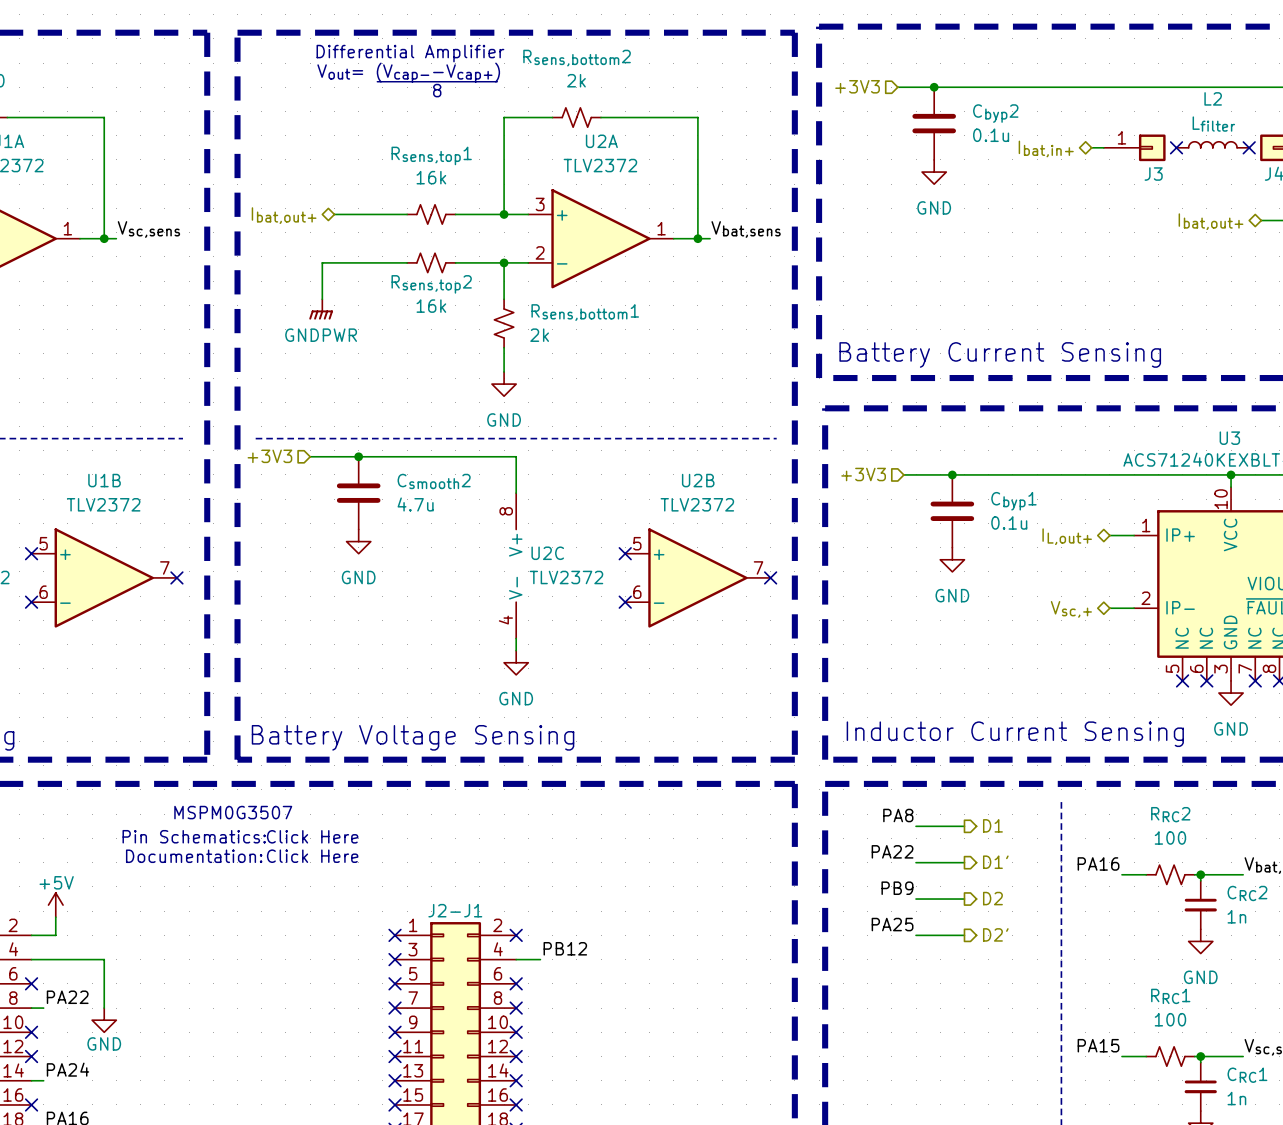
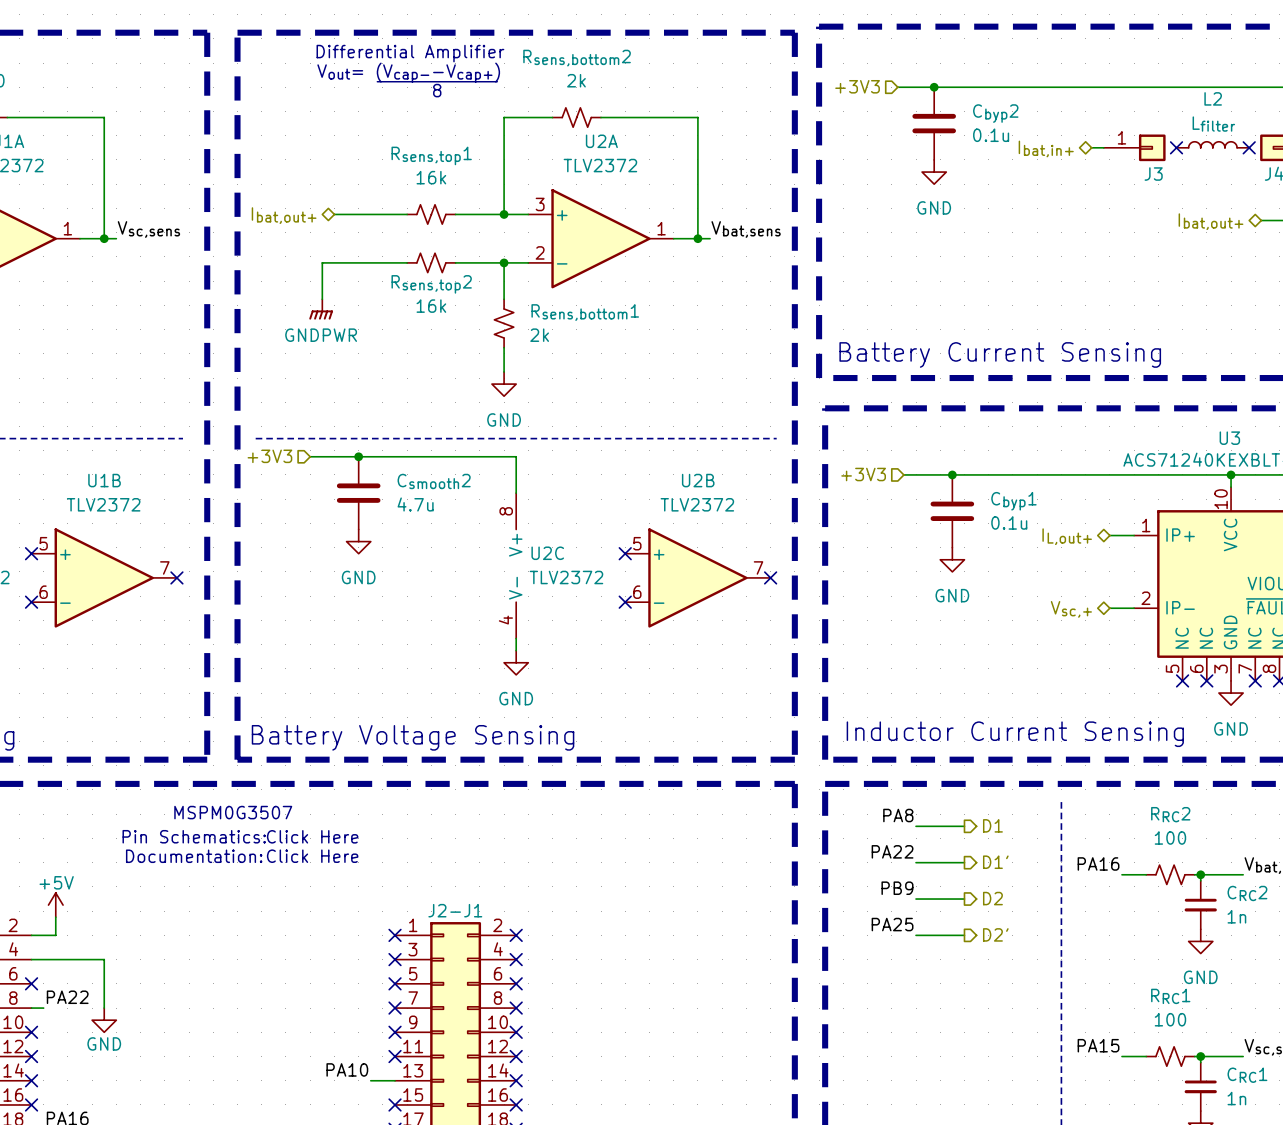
label: PB12 (565, 948) -> none
wire: (516, 959) (540, 959) -> (370, 1080) (395, 1080)
no-connect mark: none -> (516, 959)
label: PA24 (67, 1069) -> none
label: none -> PA10 (347, 1069)
wire: (31, 1080) (43, 1080) -> none
no-connect mark: none -> (31, 1080)
no-connect mark: (395, 1080) -> none

